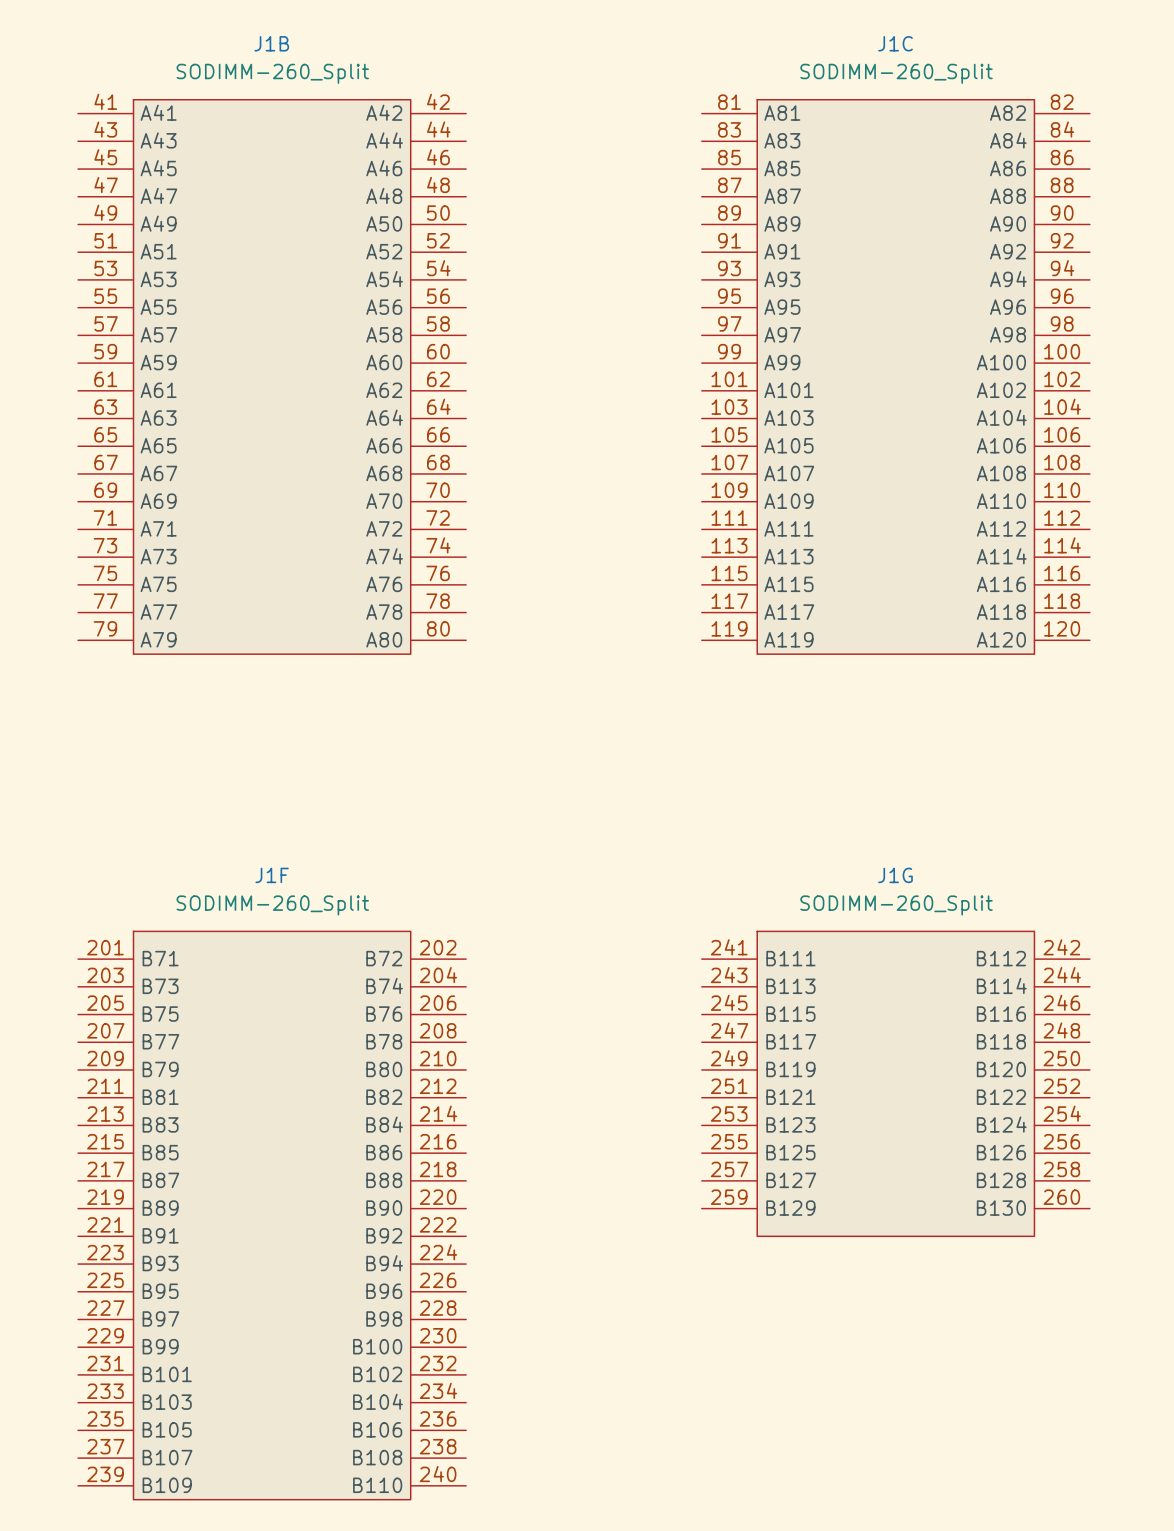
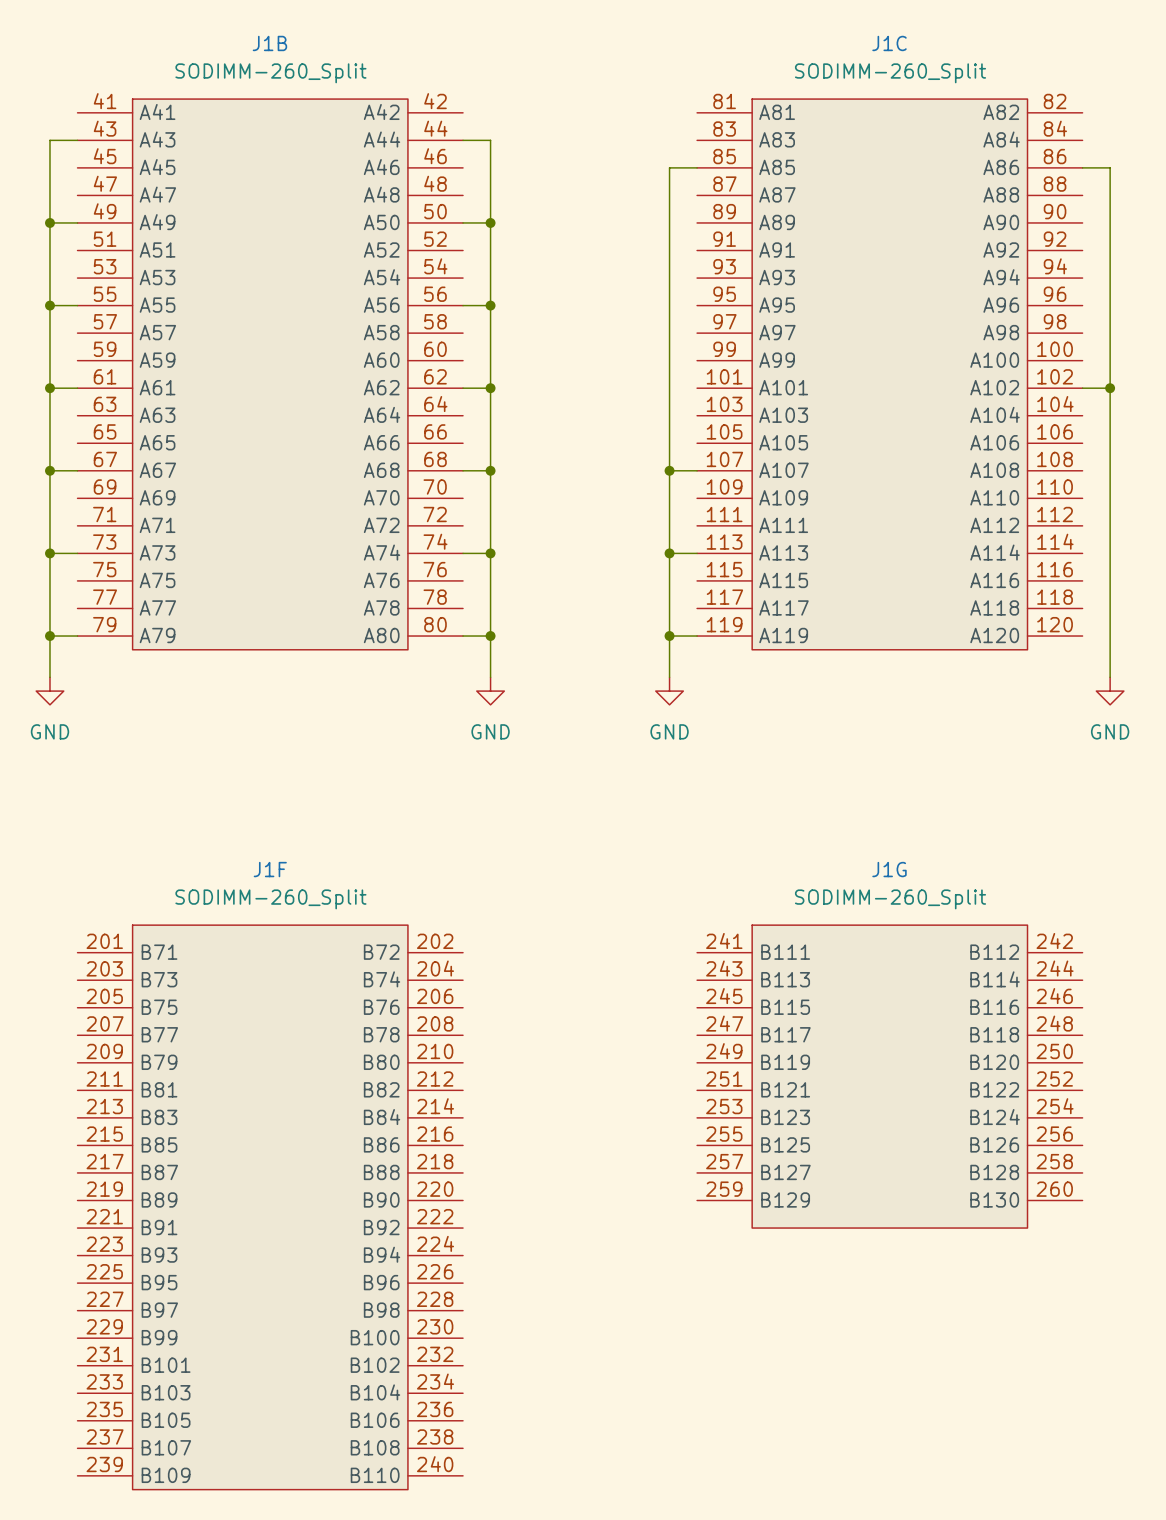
wire: none -> (77, 140) (49, 140) (49, 677)
wire: none -> (463, 140) (490, 140) (490, 677)
wire: none -> (697, 167) (669, 167) (669, 677)
wire: none -> (1082, 167) (1110, 167) (1110, 677)
wire: none -> (49, 222) (77, 222)
junction: none -> (49, 222)
wire: none -> (463, 222) (490, 222)
junction: none -> (490, 222)
wire: none -> (49, 305) (77, 305)
junction: none -> (49, 305)
wire: none -> (463, 305) (490, 305)
junction: none -> (490, 305)
wire: none -> (49, 388) (77, 388)
junction: none -> (49, 388)
wire: none -> (463, 388) (490, 388)
junction: none -> (490, 388)
wire: none -> (1082, 388) (1110, 388)
junction: none -> (1110, 388)
wire: none -> (49, 470) (77, 470)
junction: none -> (49, 470)
wire: none -> (463, 470) (490, 470)
junction: none -> (490, 470)
wire: none -> (669, 470) (697, 470)
junction: none -> (669, 470)
wire: none -> (49, 553) (77, 553)
junction: none -> (49, 553)
wire: none -> (463, 553) (490, 553)
junction: none -> (490, 553)
wire: none -> (669, 553) (697, 553)
junction: none -> (669, 553)
wire: none -> (49, 636) (77, 636)
junction: none -> (49, 636)
wire: none -> (463, 636) (490, 636)
junction: none -> (490, 636)
wire: none -> (669, 636) (697, 636)
junction: none -> (669, 636)
power symbol: none -> GND (49, 691)
power symbol: none -> GND (490, 691)
power symbol: none -> GND (669, 691)
power symbol: none -> GND (1110, 691)

